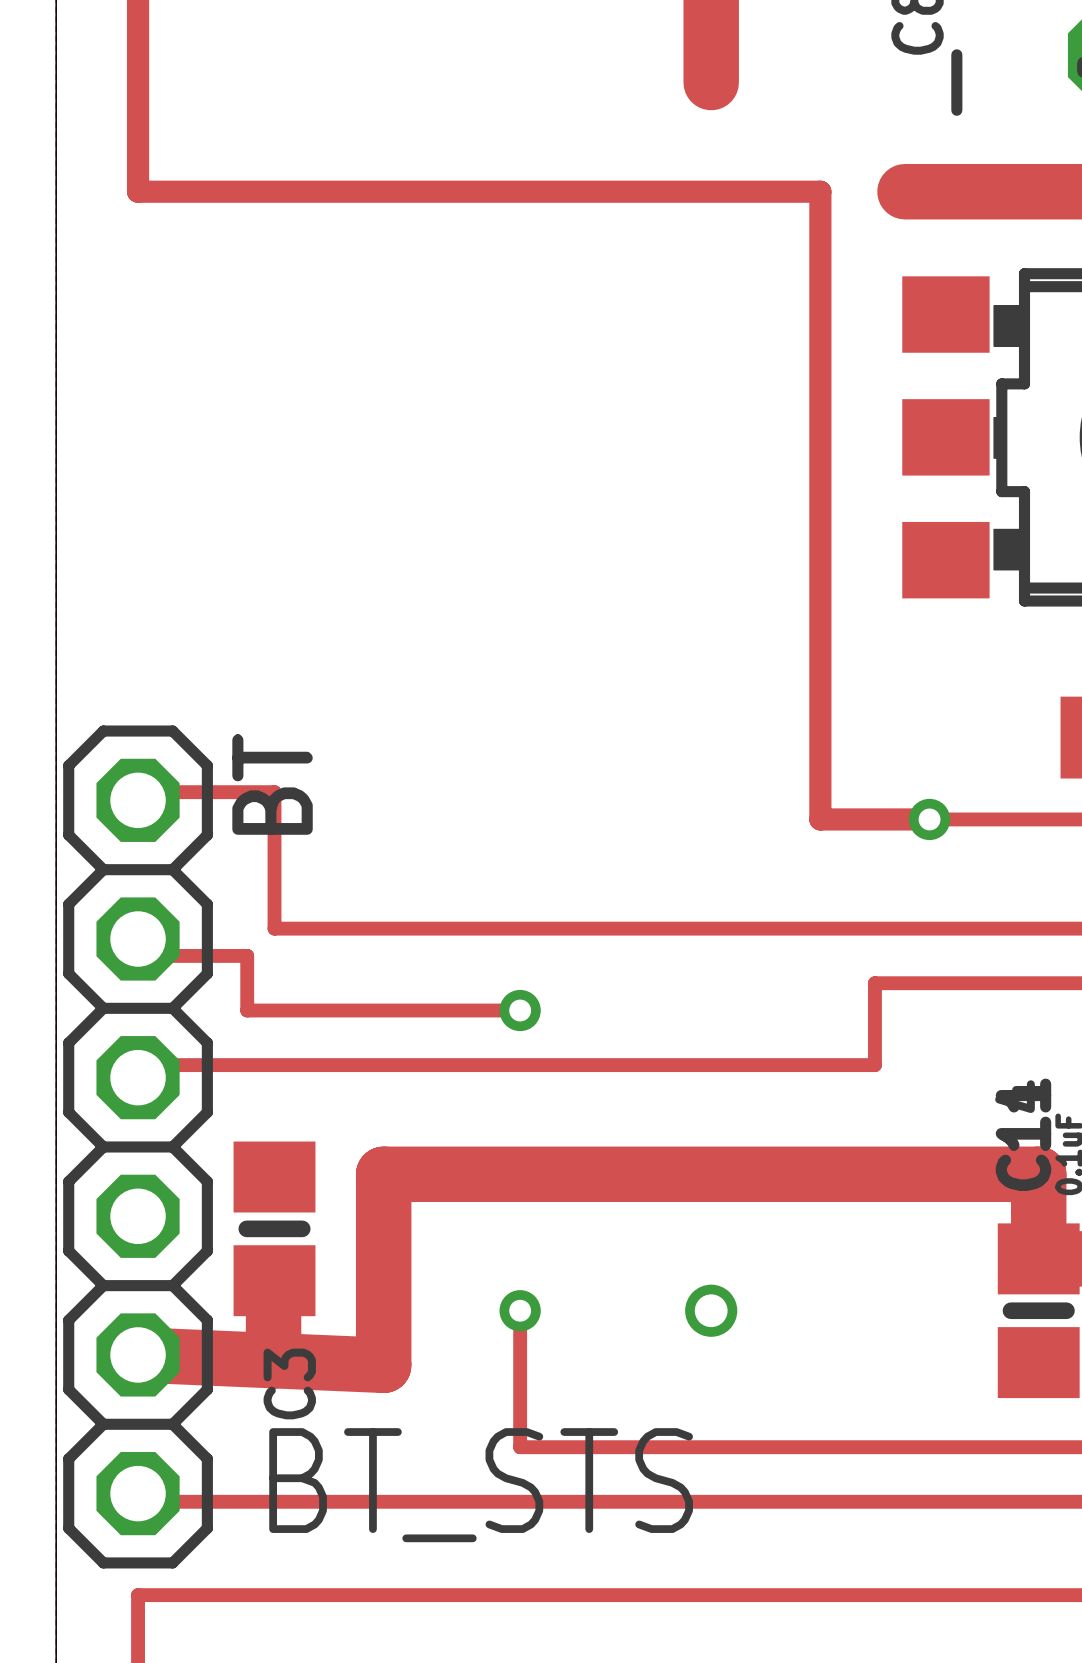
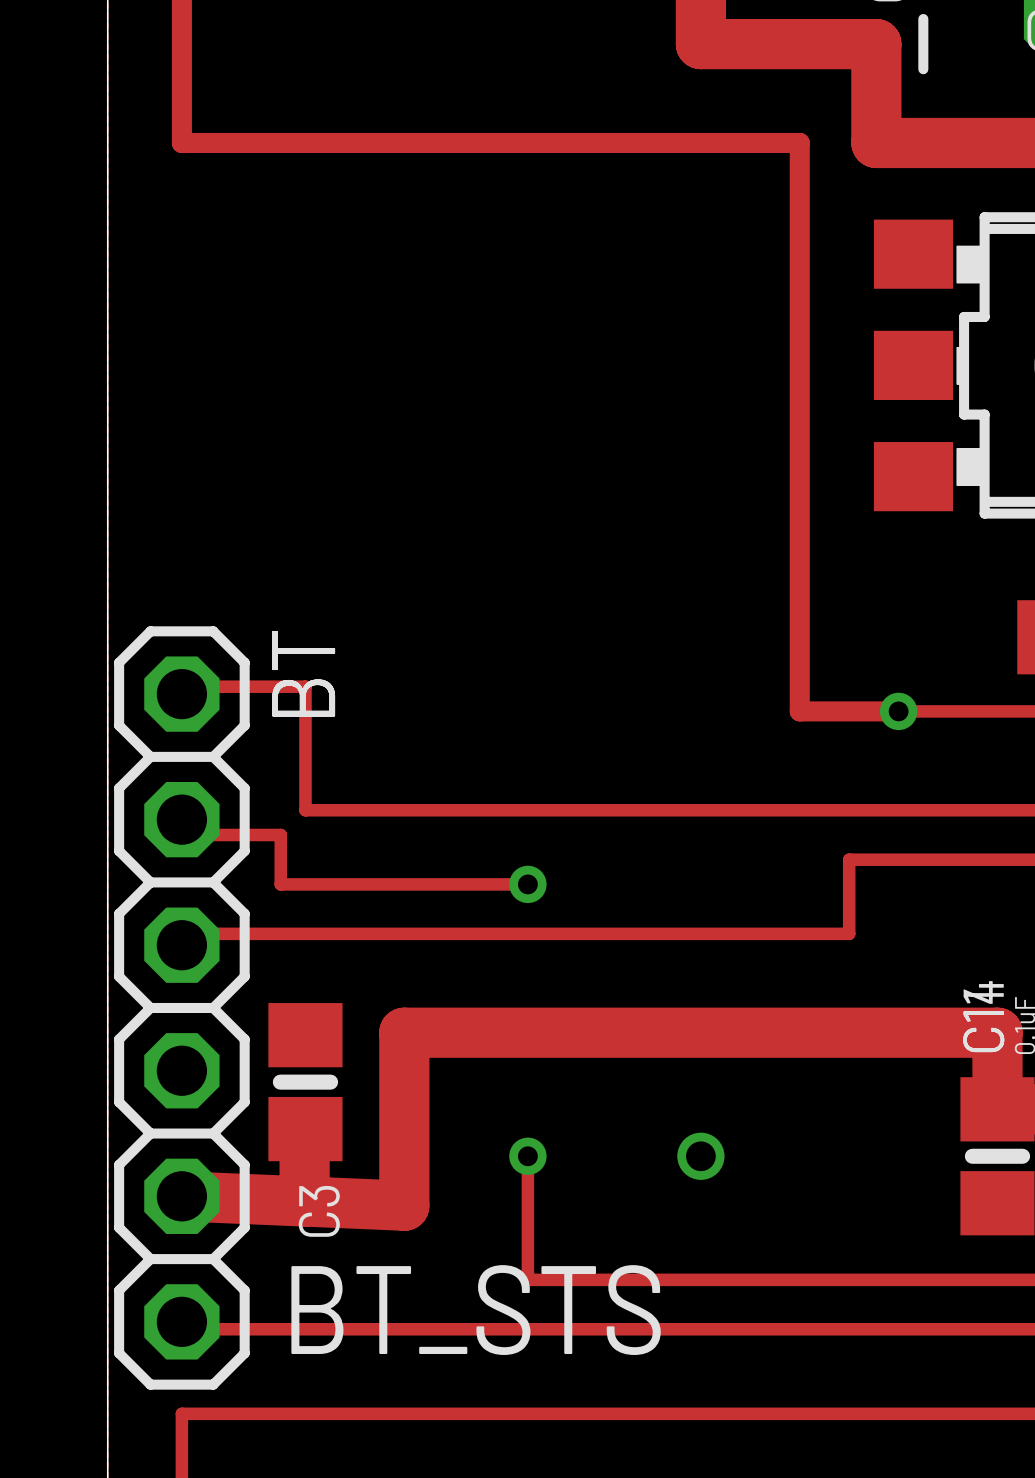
track: none -> (700, 44) (876, 44) (876, 142)

